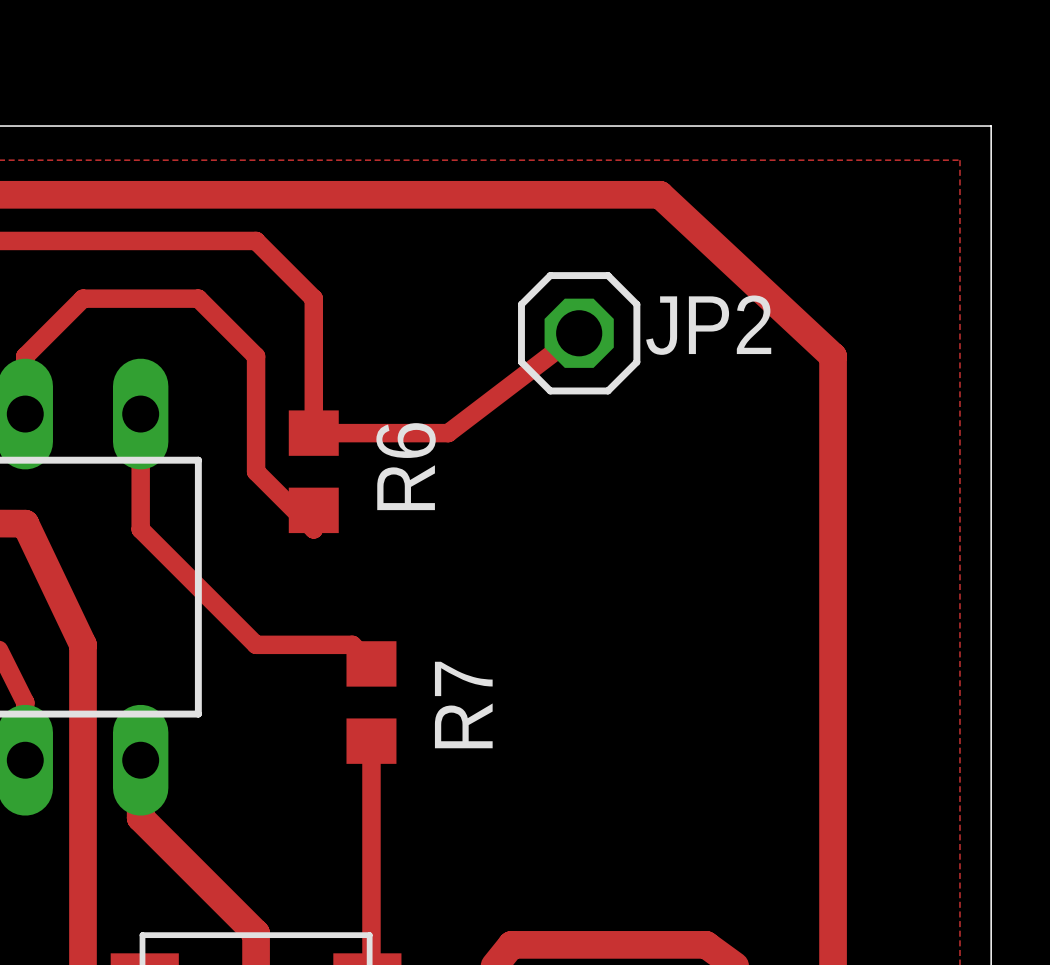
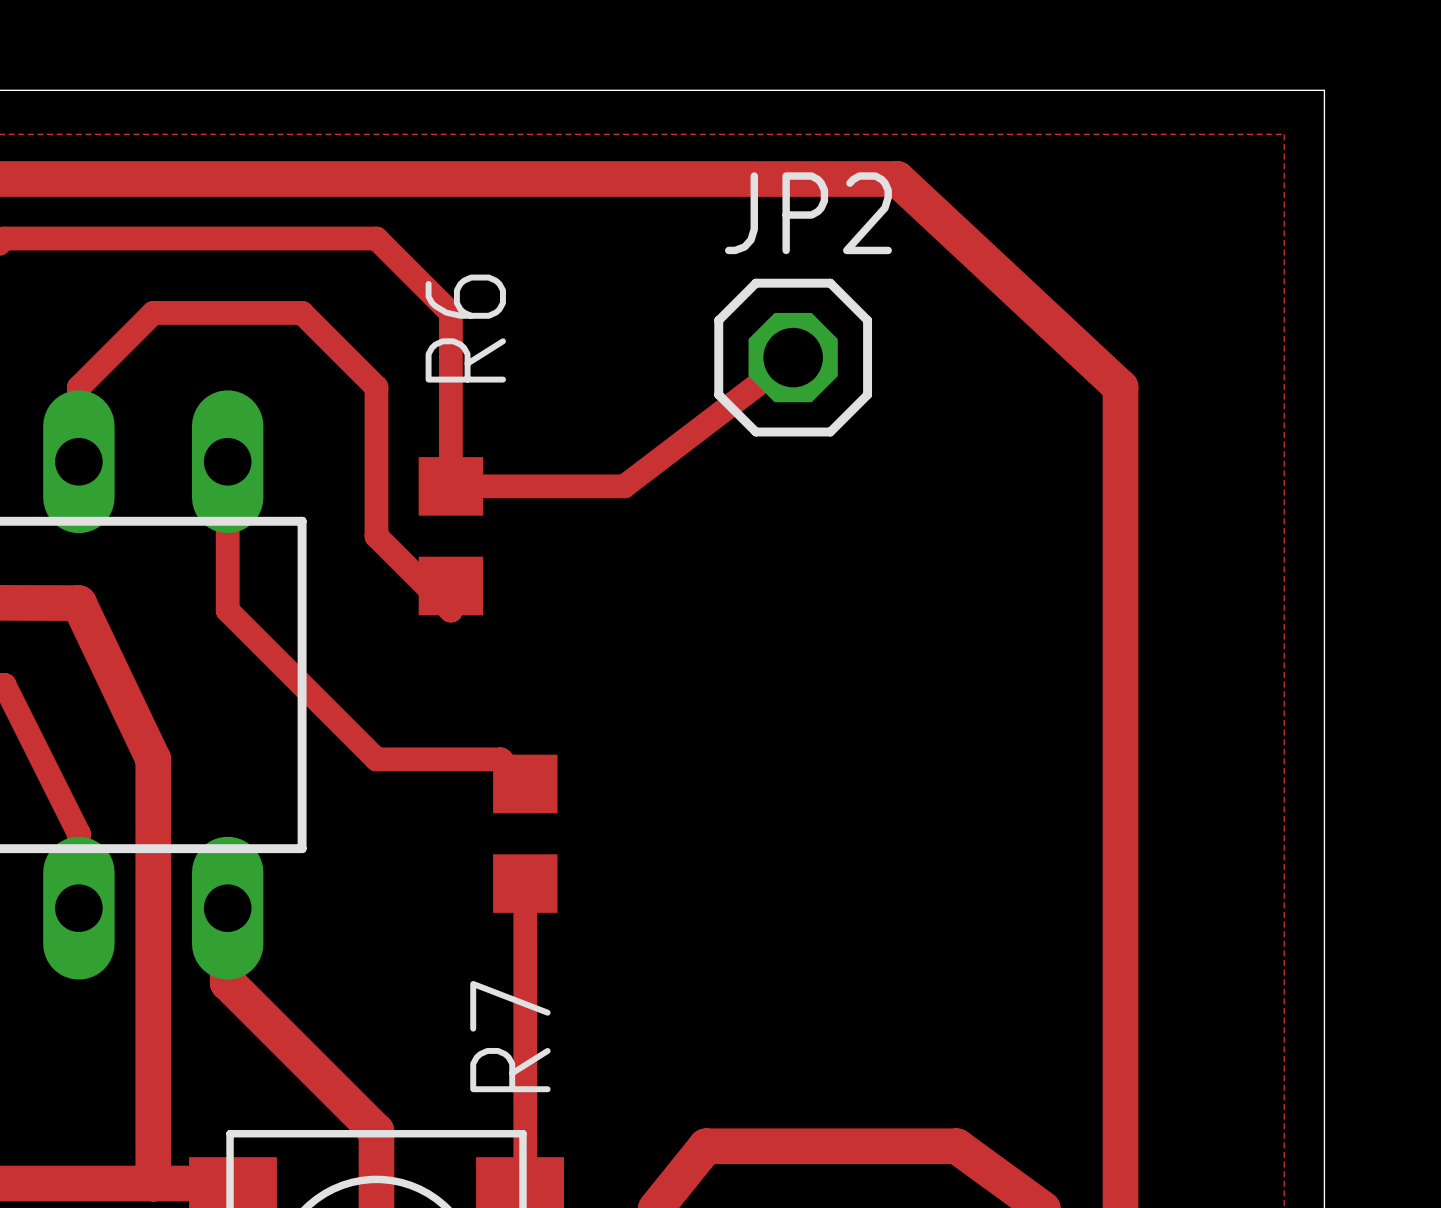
JP2 name position: JP2 (708, 325) -> JP2 (808, 213)
R6 name position: R6 (406, 466) -> R6 (465, 328)
R7 name position: R7 (463, 705) -> R7 (510, 1036)

